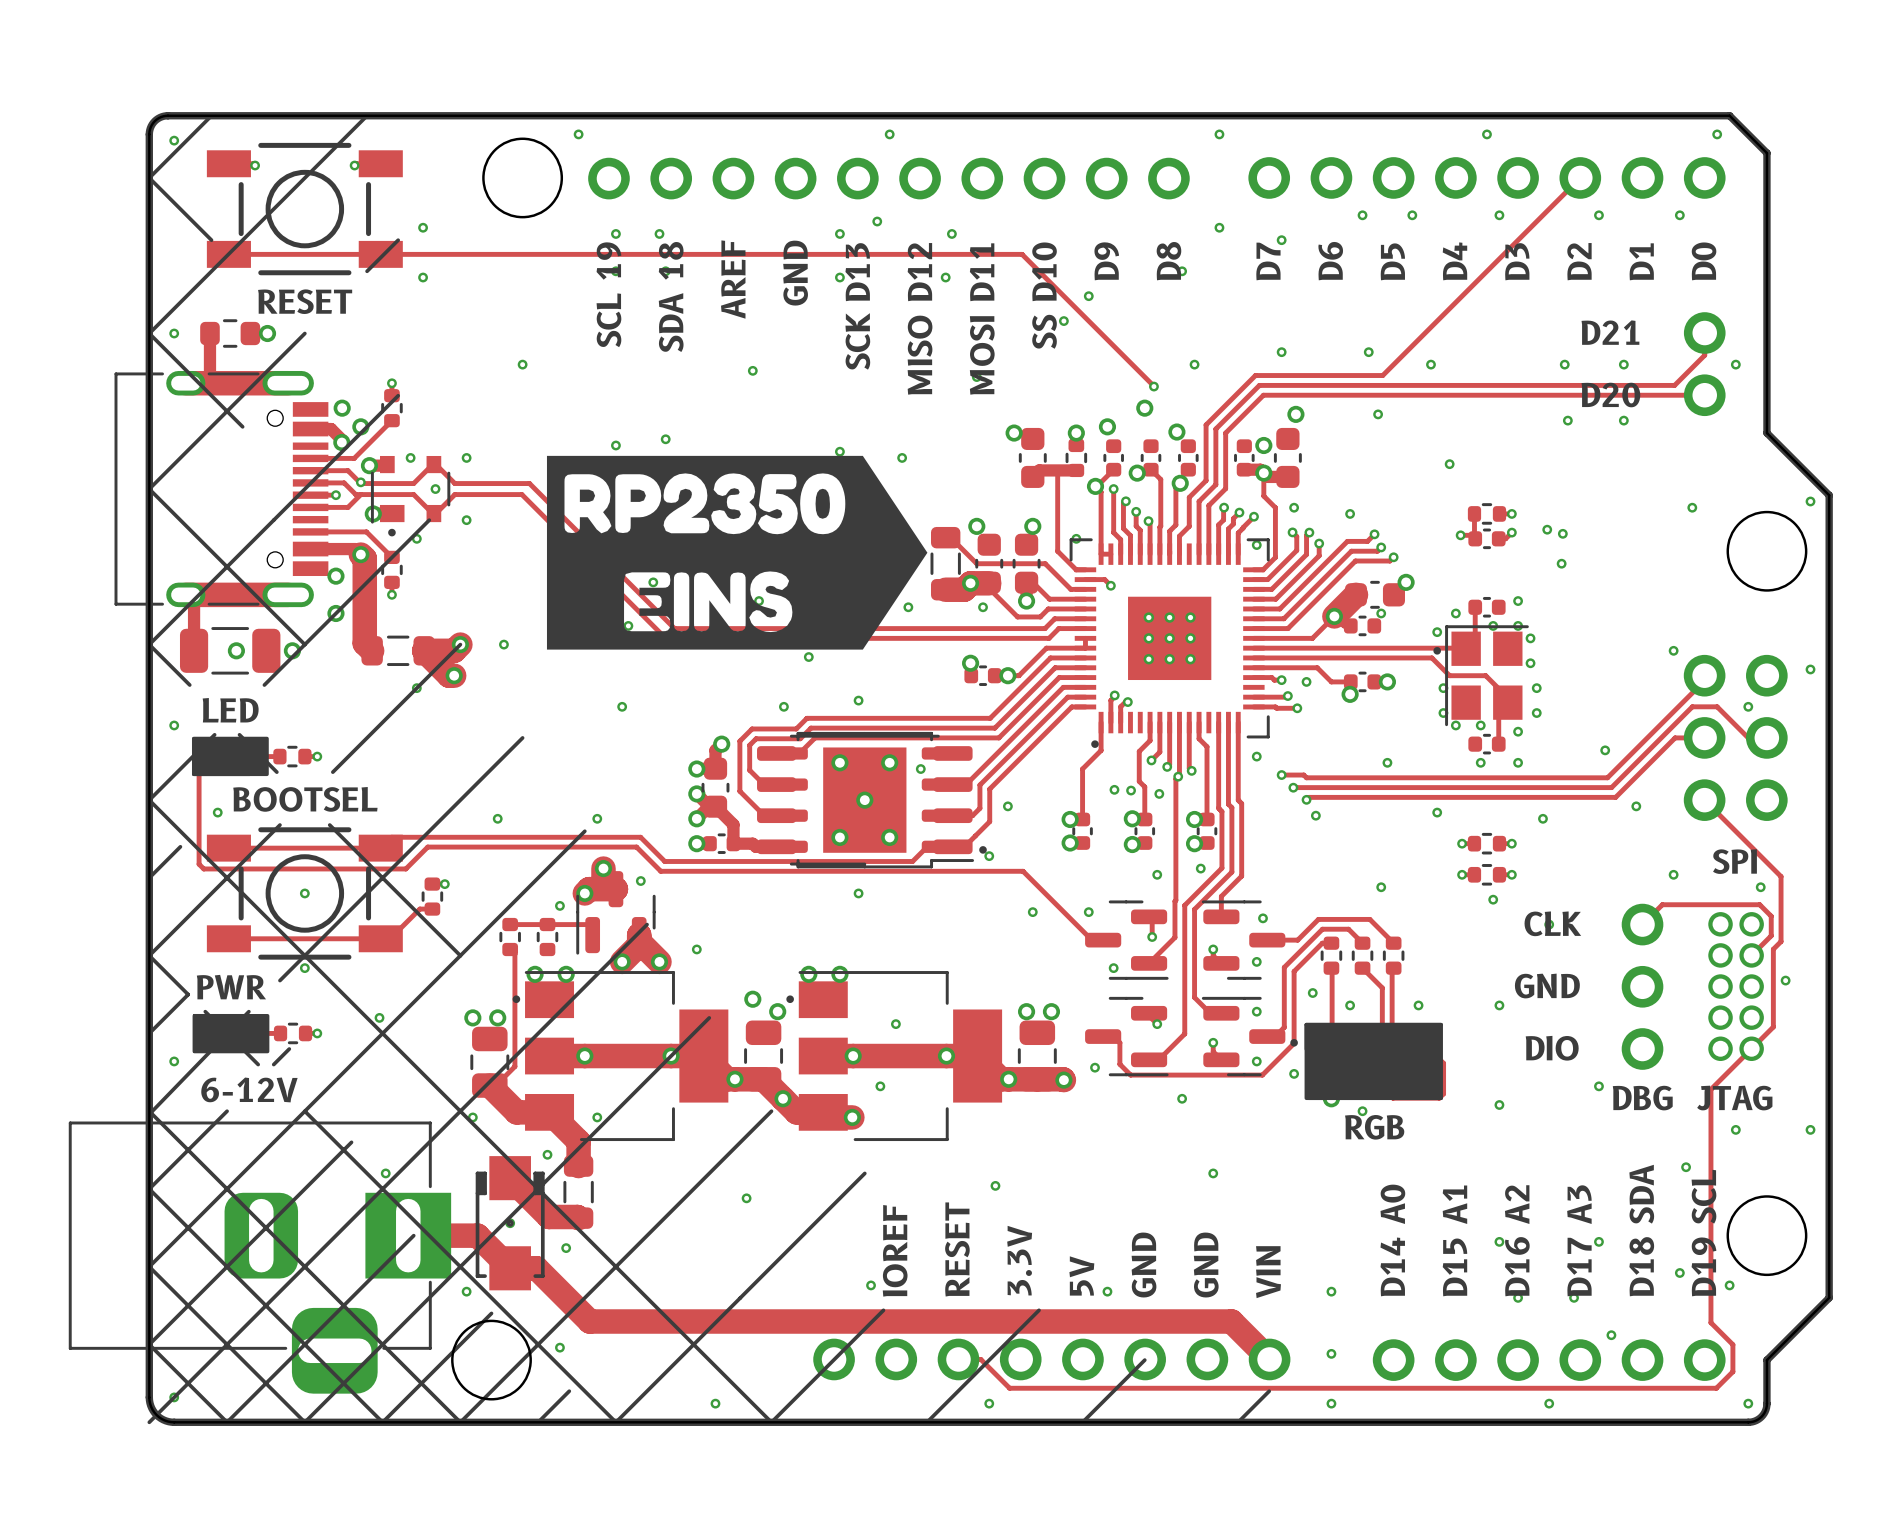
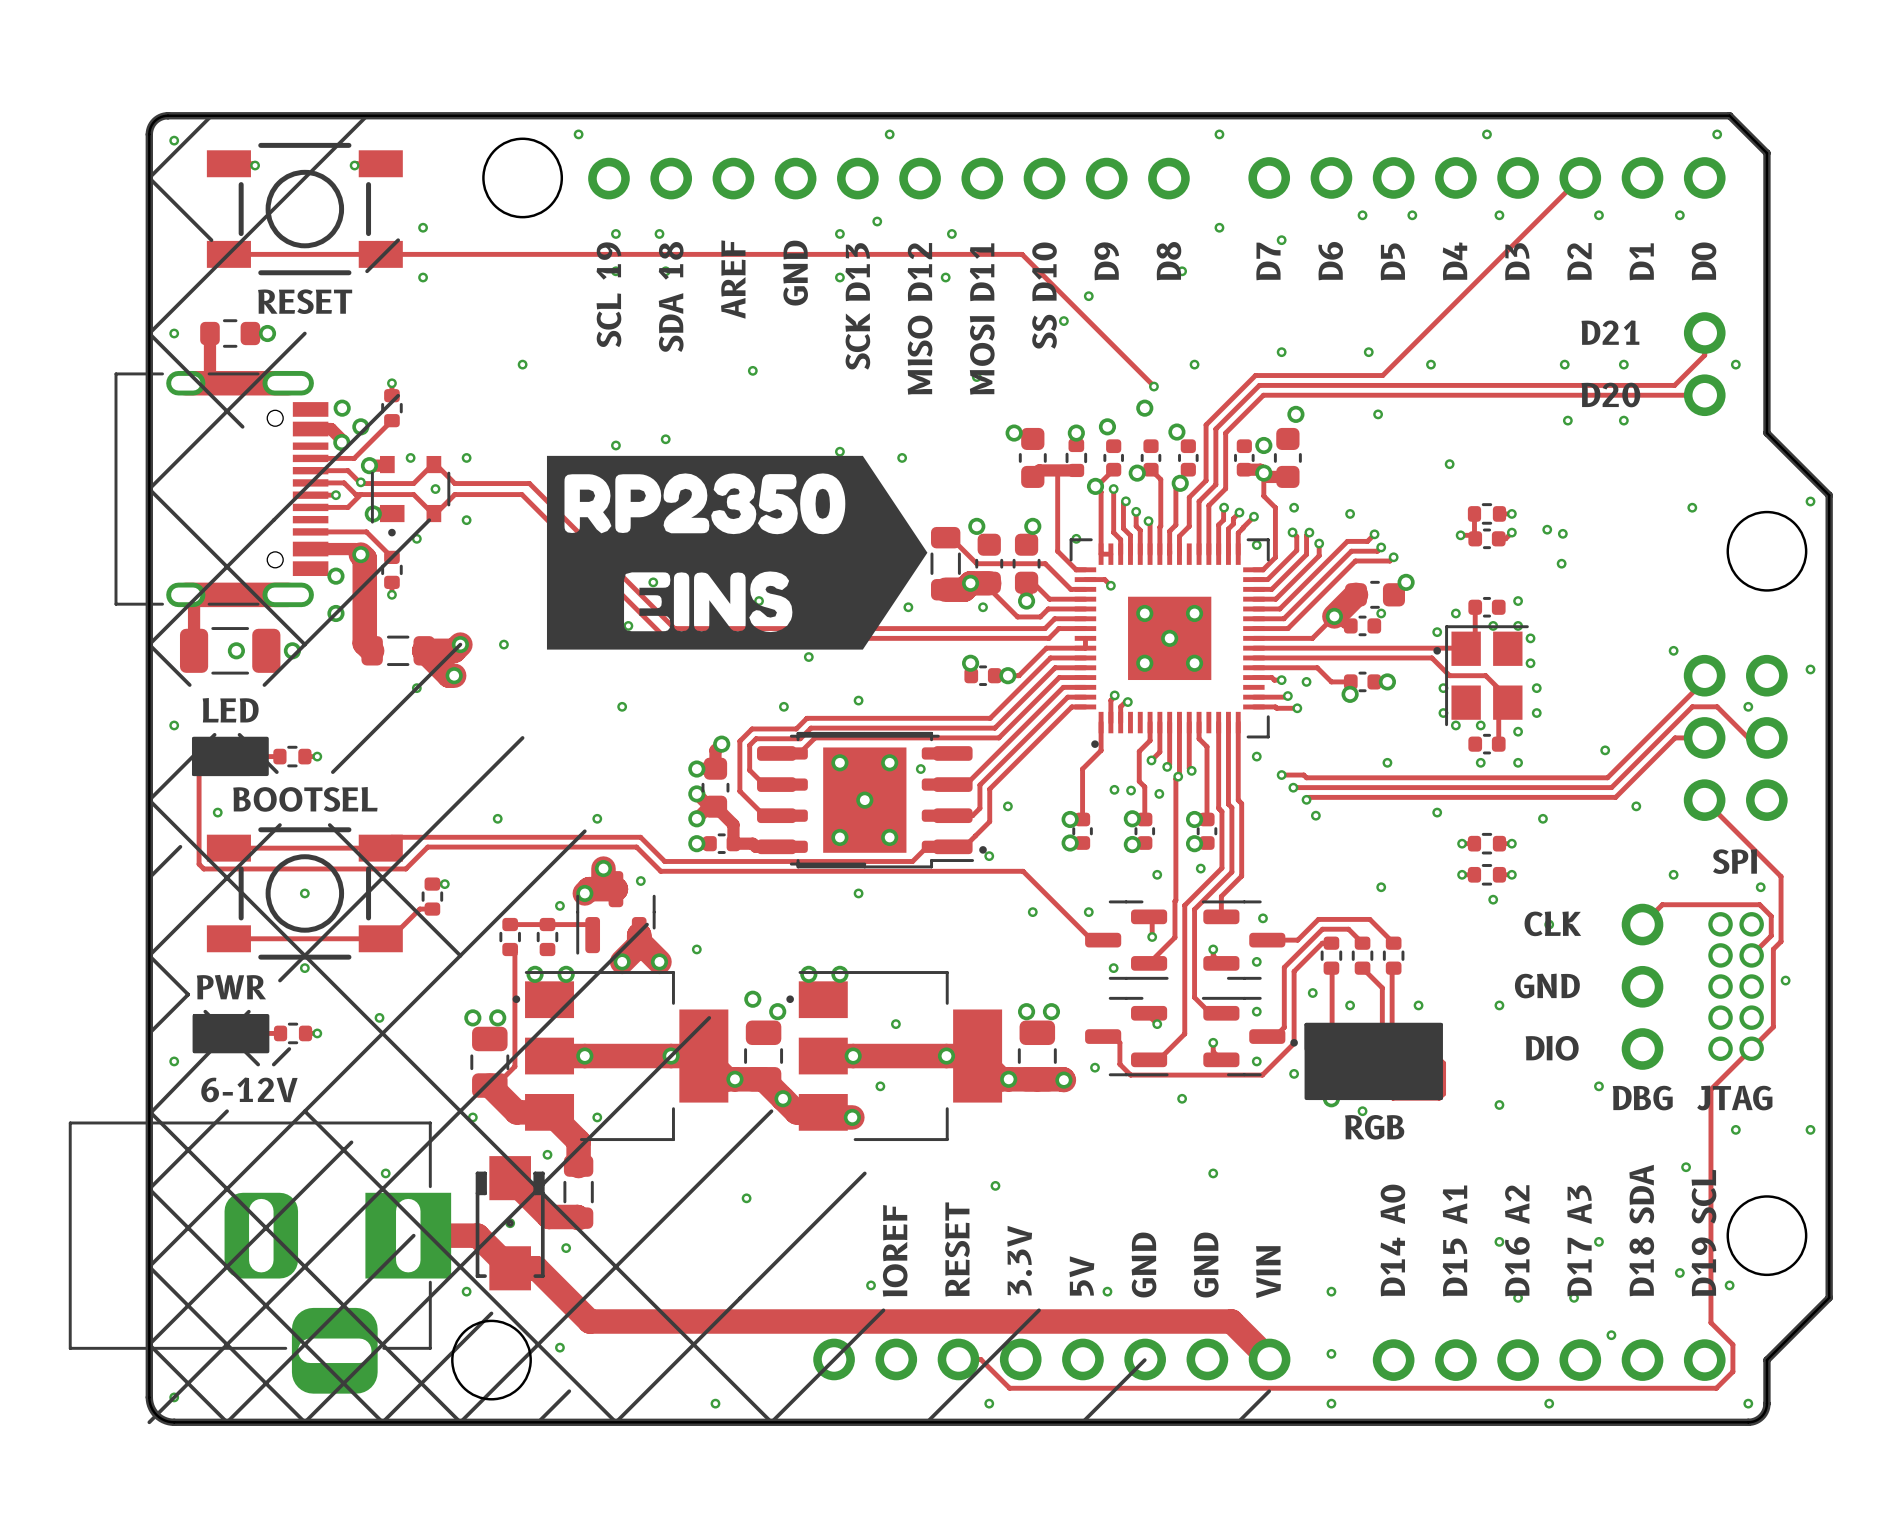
part footprint: [1069, 538, 1270, 739] -> [1069, 538, 1270, 739]
via: none -> (1144, 613)
via: none -> (1194, 613)
via: none -> (1169, 638)
via: none -> (1144, 663)
via: none -> (1194, 663)

